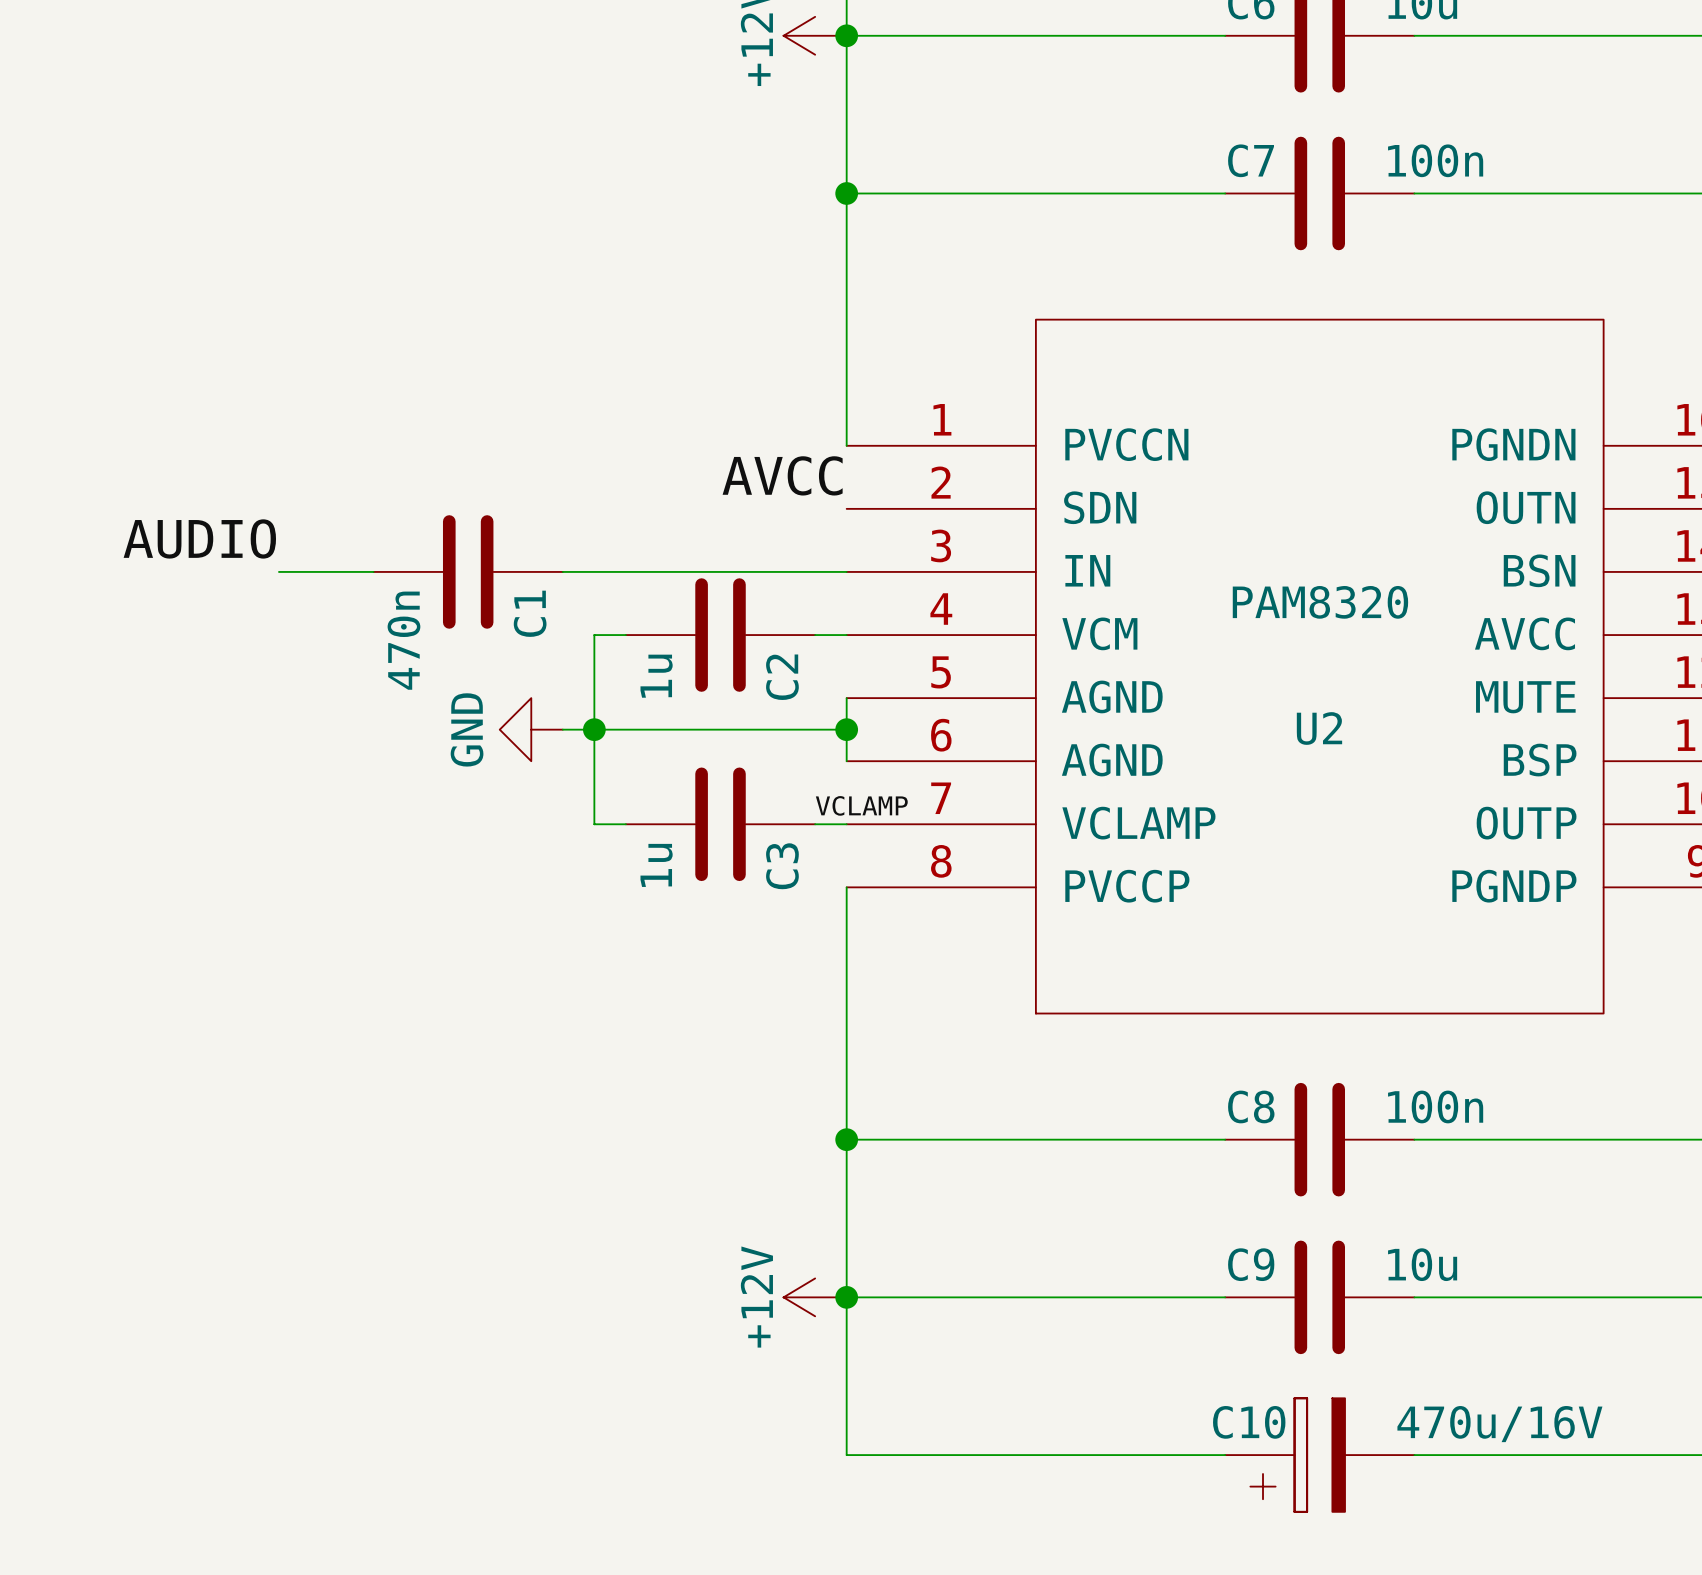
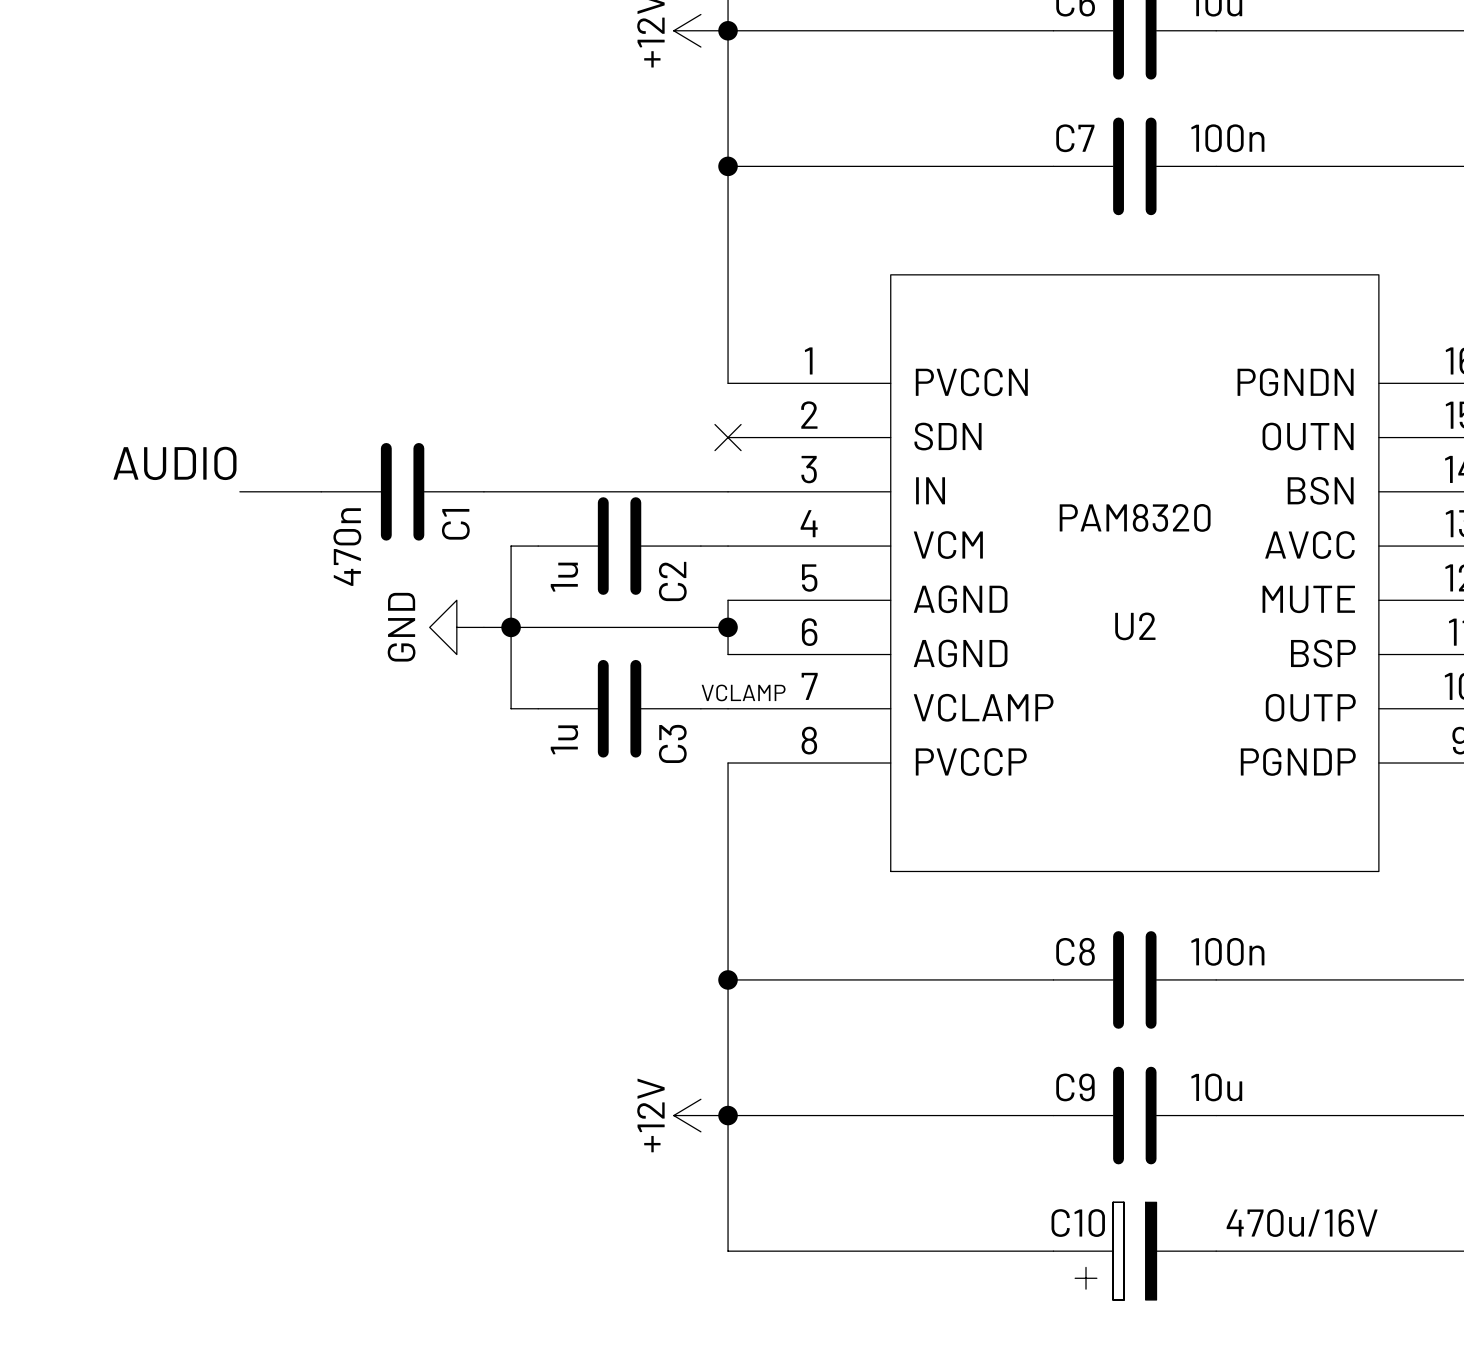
label: AVCC (782, 475) -> none
no-connect mark: none -> (728, 437)

